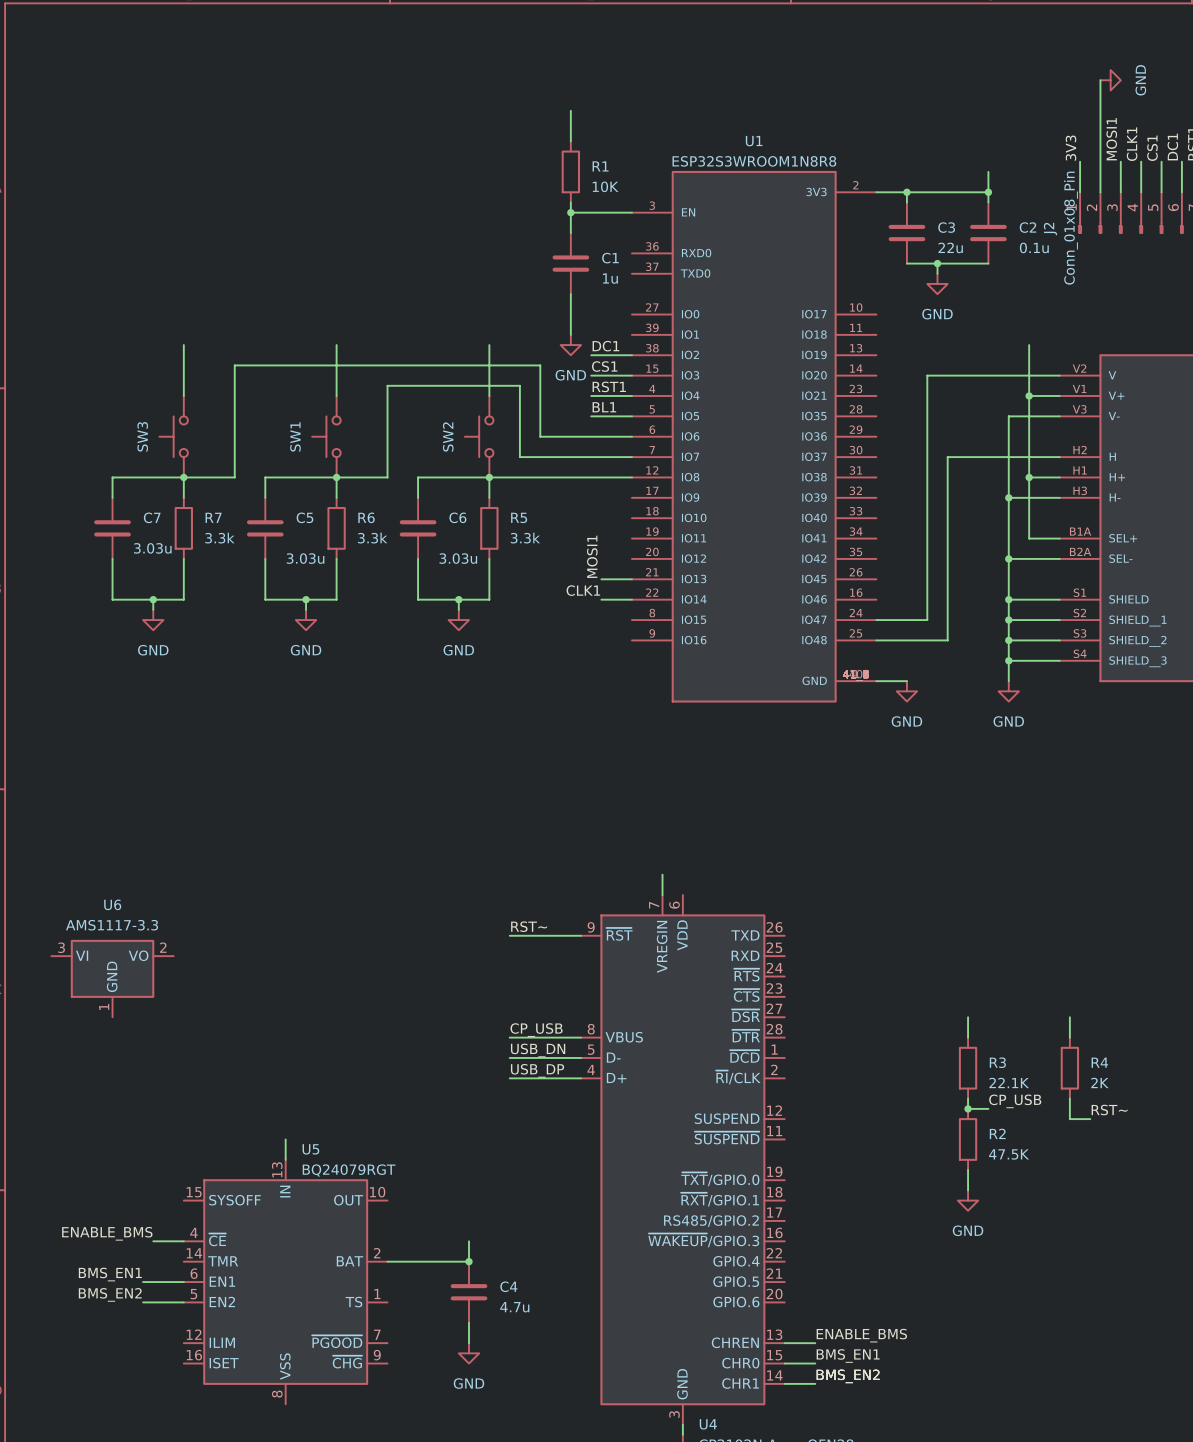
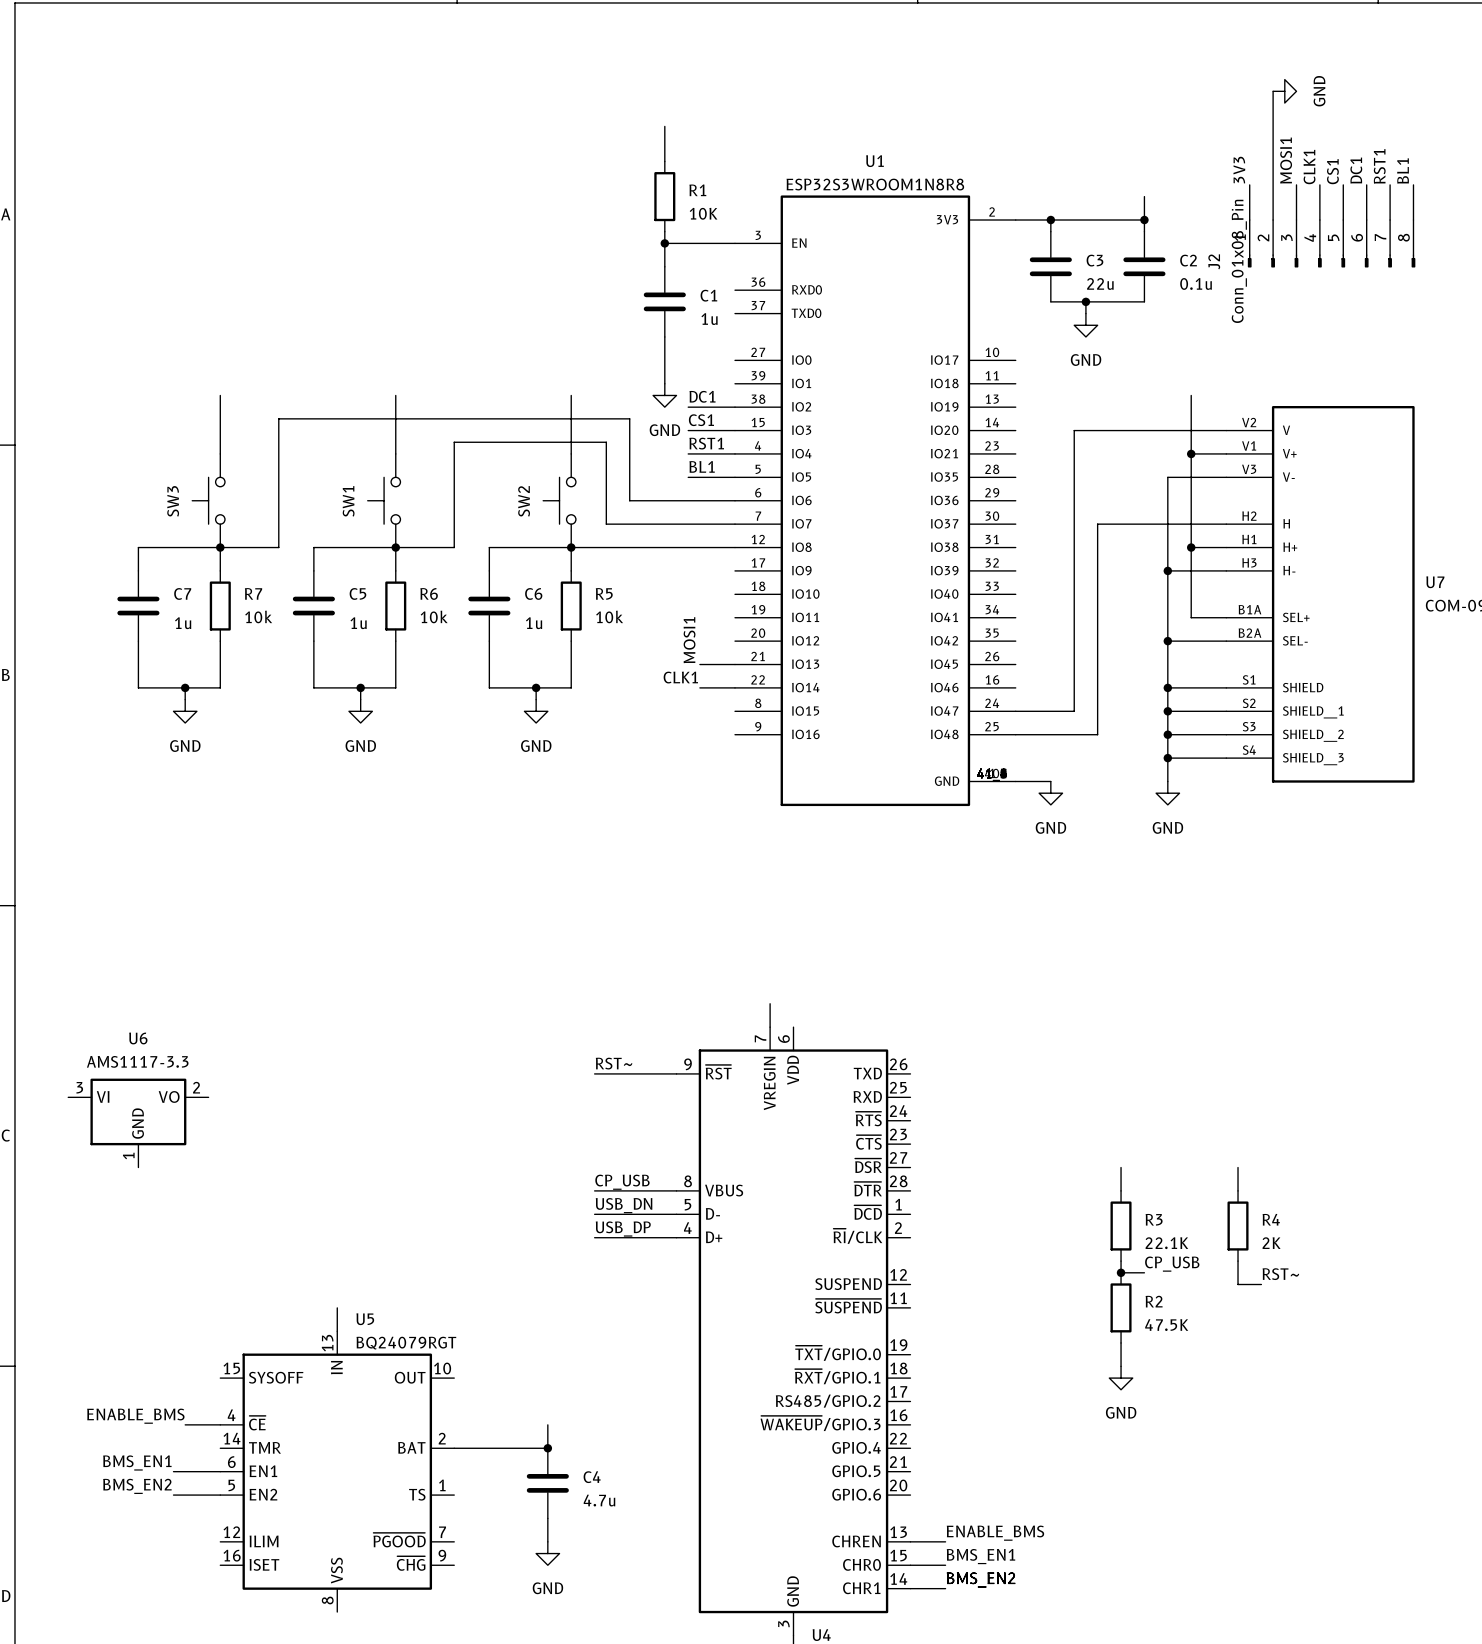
R7 value: 3.3k (219, 538) -> 10k (258, 616)
R6 value: 3.3k (372, 538) -> 10k (434, 616)
R5 value: 3.3k (525, 538) -> 10k (609, 616)
C7 value: 3.03u (152, 548) -> 1u (183, 623)
C5 value: 3.03u (305, 558) -> 1u (358, 623)
C6 value: 3.03u (458, 558) -> 1u (534, 623)

